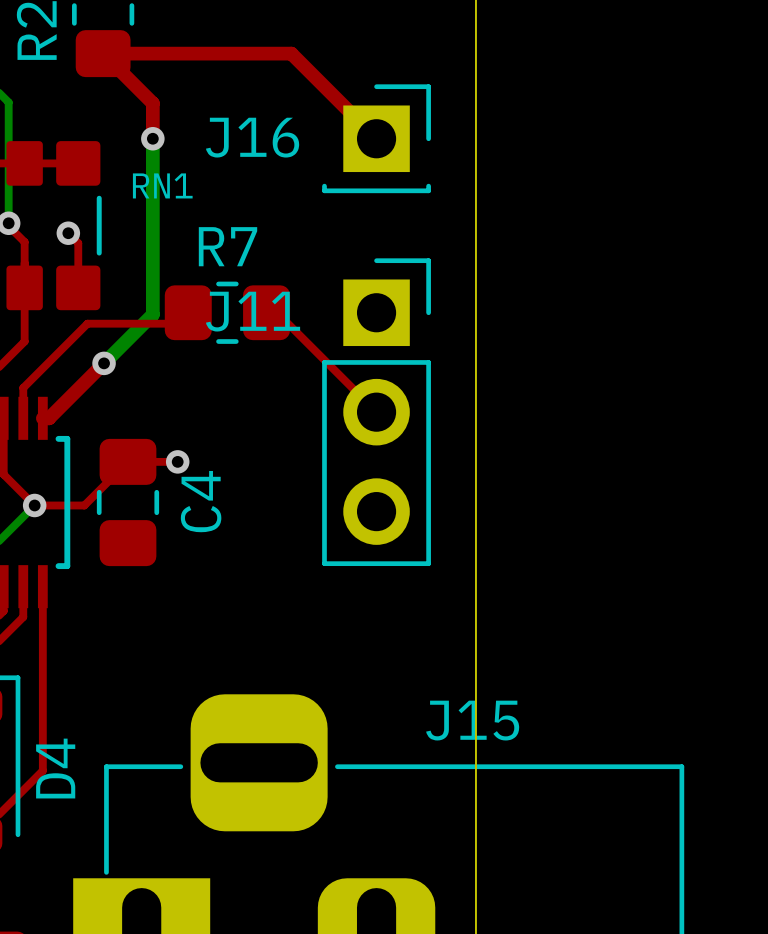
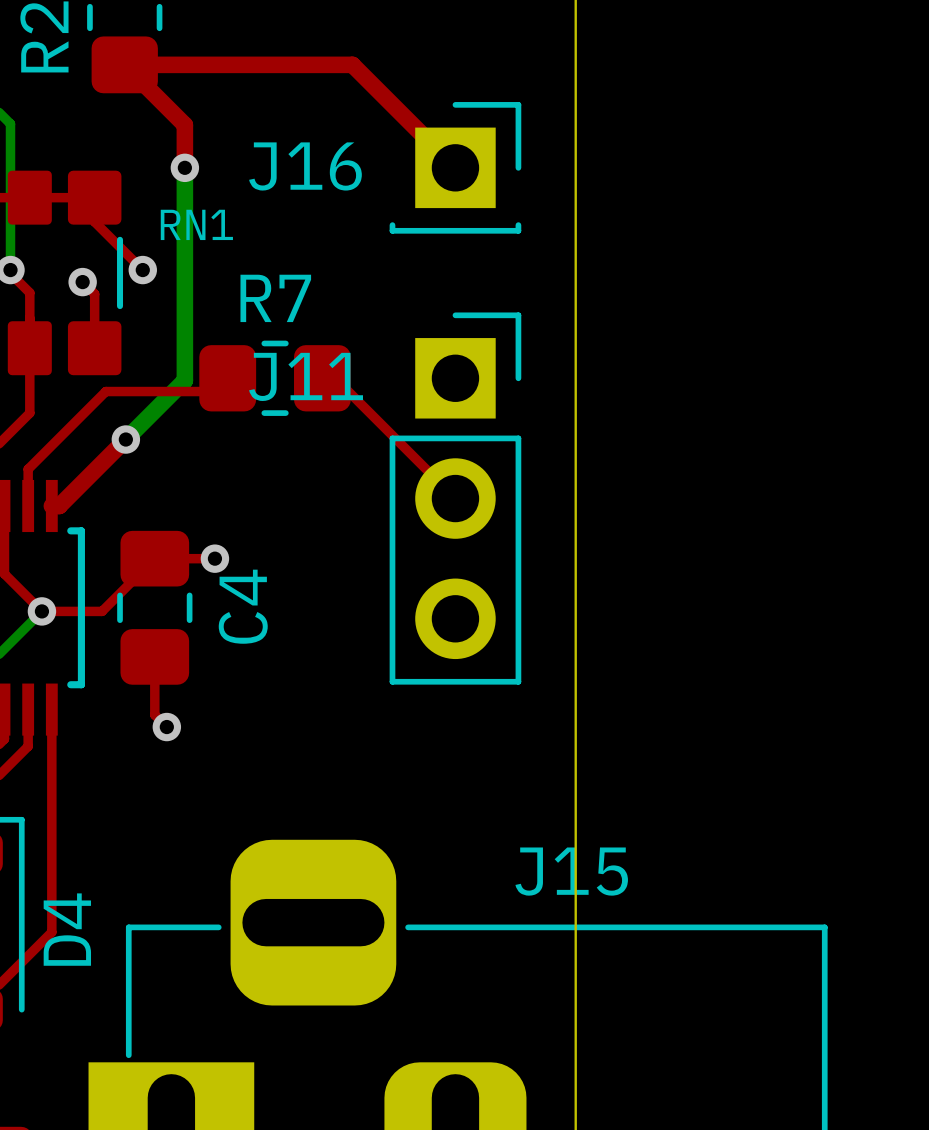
top track: none -> (94, 197) (94, 221) (142, 270)
via: none -> (142, 270)
top track: none -> (154, 656) (154, 715) (166, 727)
via: none -> (166, 727)

